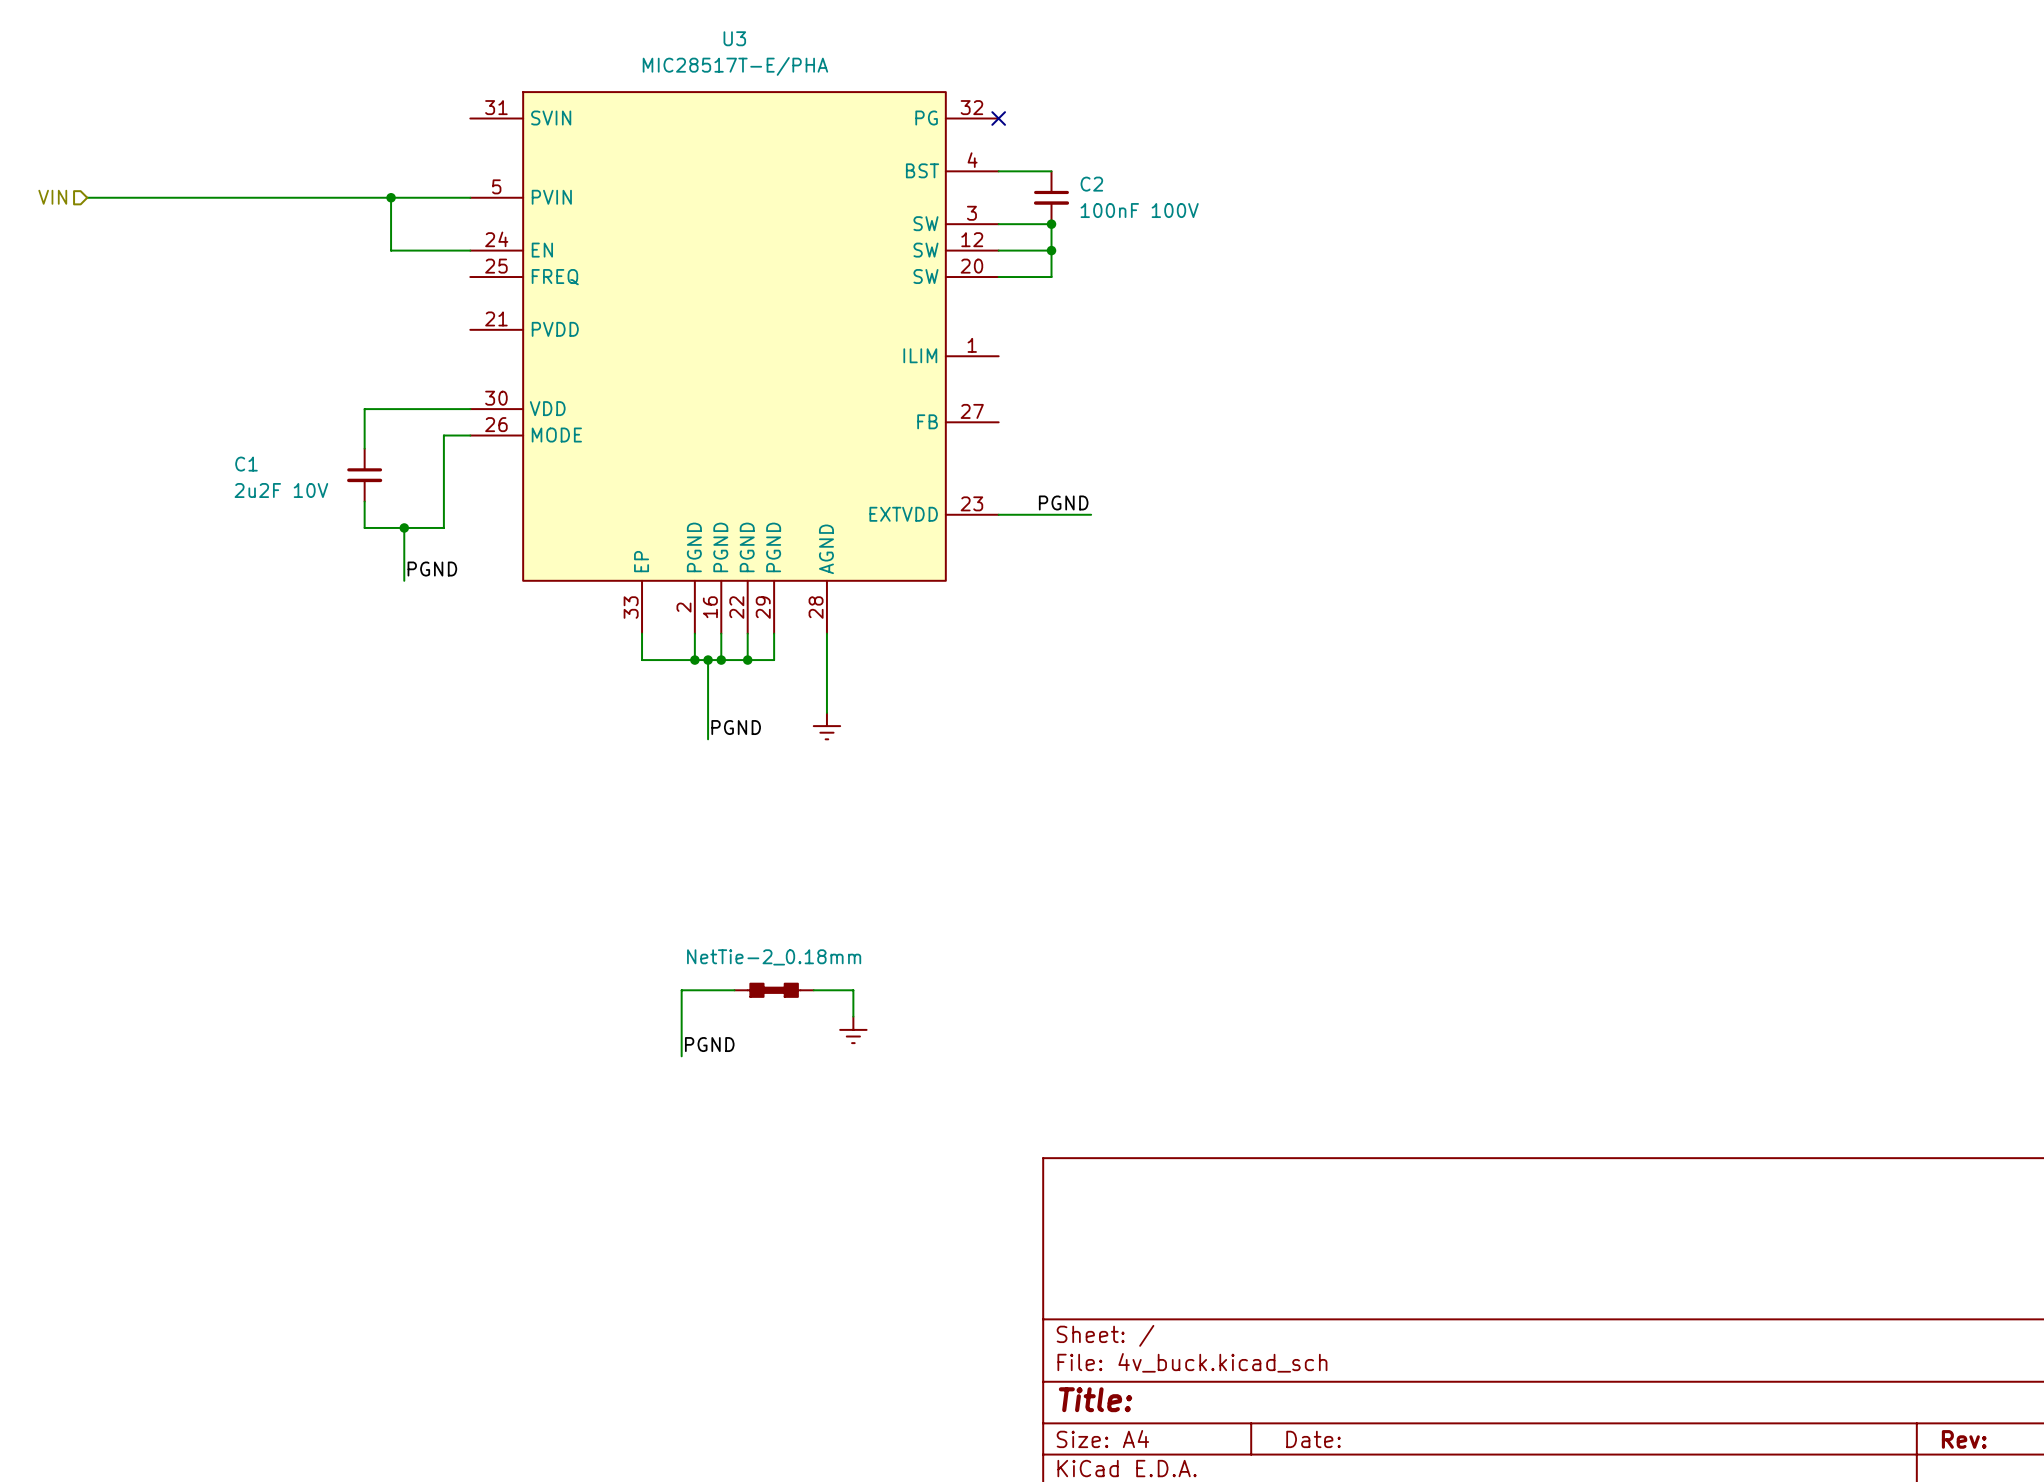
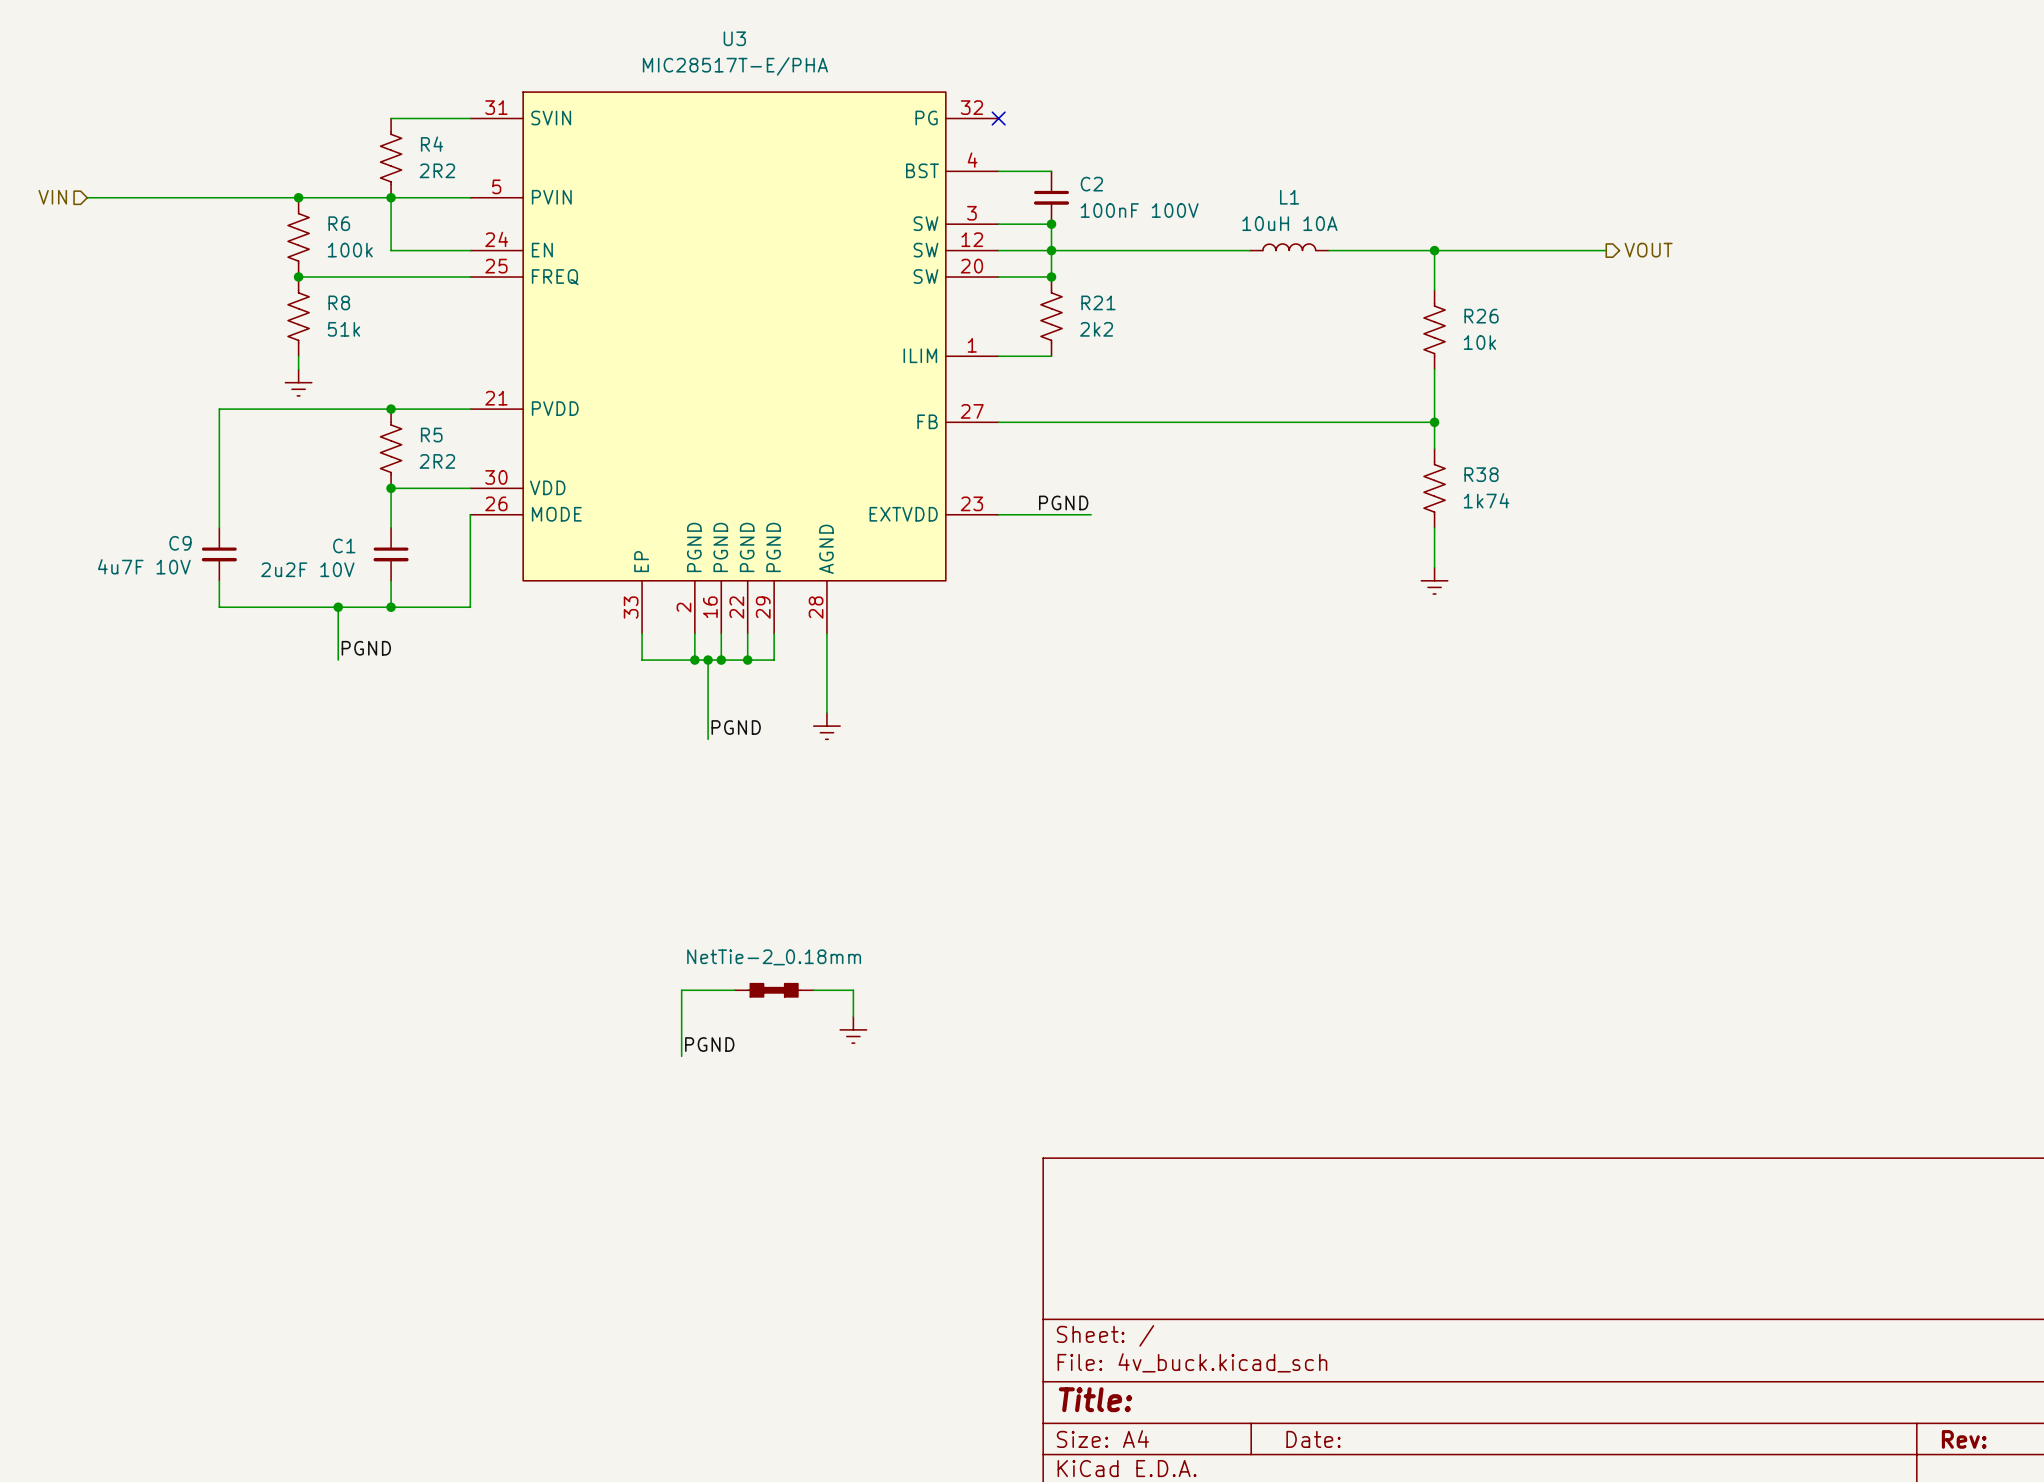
U3 symbol: [470, 92, 999, 634] -> [470, 92, 999, 634]
wire: none -> (391, 118) (470, 118)
R4: none -> 2R2 (391, 158)
junction: none -> (298, 197)
R6: none -> 100k (298, 237)
L1: none -> 10uH 10A (1289, 247)
wire: none -> (1051, 250) (1249, 250)
wire: none -> (1328, 250) (1606, 250)
wire: none -> (1434, 250) (1434, 290)
junction: none -> (1434, 250)
hierarchical label: none -> VOUT (1648, 250)
wire: none -> (298, 277) (470, 277)
junction: none -> (298, 277)
junction: none -> (1051, 277)
R8: none -> 51k (298, 316)
R21: none -> 2k2 (1051, 316)
R26: none -> 10k (1434, 329)
wire: none -> (298, 356) (298, 369)
wire: none -> (998, 356) (1051, 356)
wire: none -> (1434, 369) (1434, 448)
power symbol: none -> (298, 382)
wire: (364, 409) (364, 448) -> (364, 409) (219, 409) (219, 527)
junction: none -> (391, 409)
wire: none -> (998, 422) (1434, 422)
junction: none -> (1434, 422)
wire: (470, 435) (443, 435) (443, 527) (364, 527) (364, 501) -> none
R5: none -> 2R2 (391, 448)
C1 name position: C1 (246, 464) -> C1 (344, 545)
C1 position: (364, 475) -> (391, 554)
junction: none -> (391, 488)
wire: none -> (470, 488) (391, 488) (391, 527)
R38: none -> 1k74 (1434, 488)
wire: none -> (470, 514) (470, 607) (219, 607) (219, 580)
wire: (404, 527) (404, 580) -> (338, 607) (338, 660)
junction: (404, 527) -> none
wire: none -> (1434, 527) (1434, 567)
C9: none -> 4u7F 10V (219, 554)
label position: PGND (432, 569) -> PGND (366, 648)
wire: none -> (391, 580) (391, 607)
power symbol: none -> (1434, 580)
junction: none -> (338, 607)
junction: none -> (391, 607)

